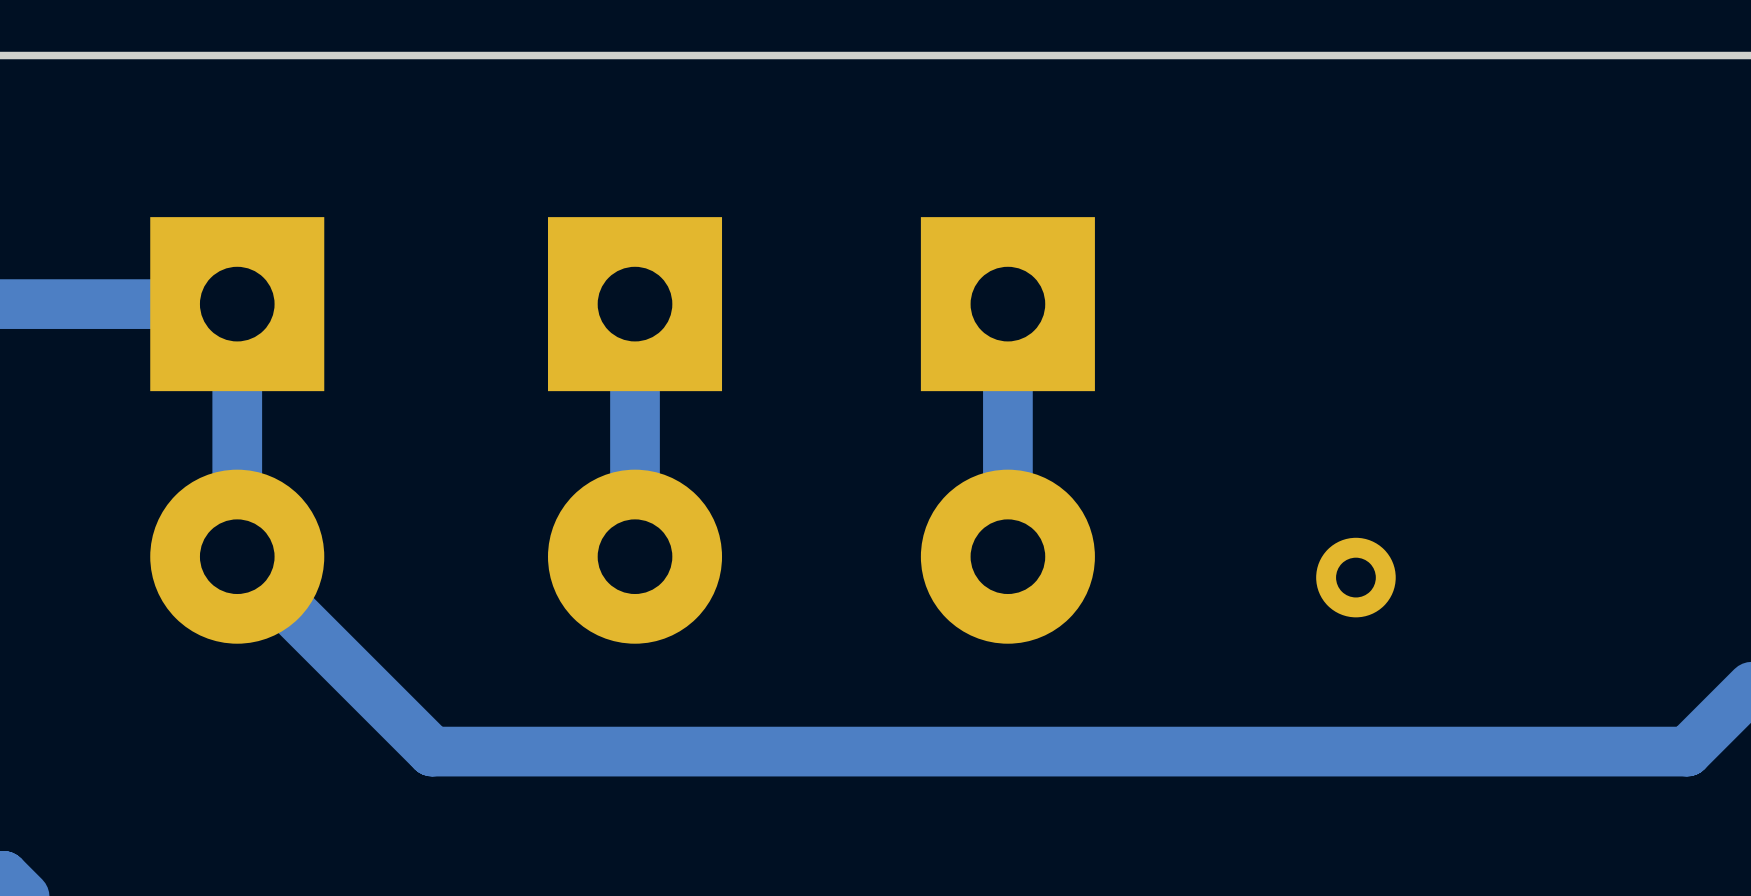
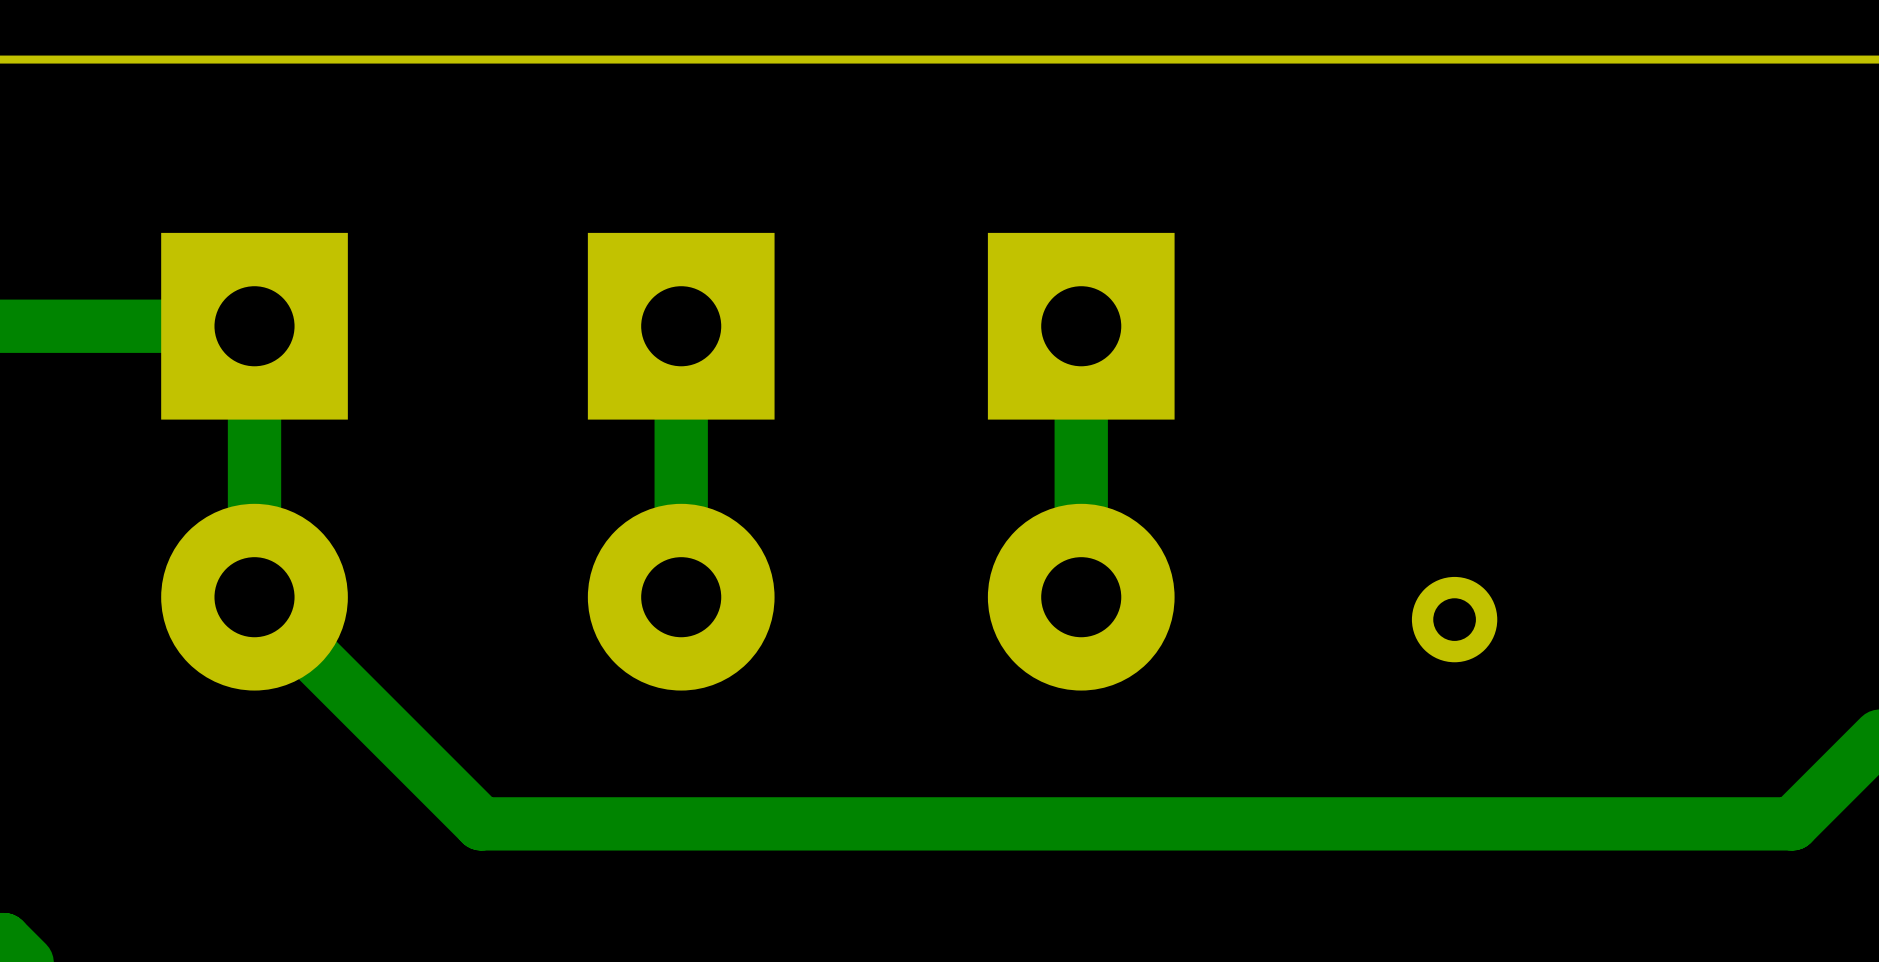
track: (1687, 751) (432, 751) -> (1809, 806) (1792, 823) (481, 823) (463, 806)

